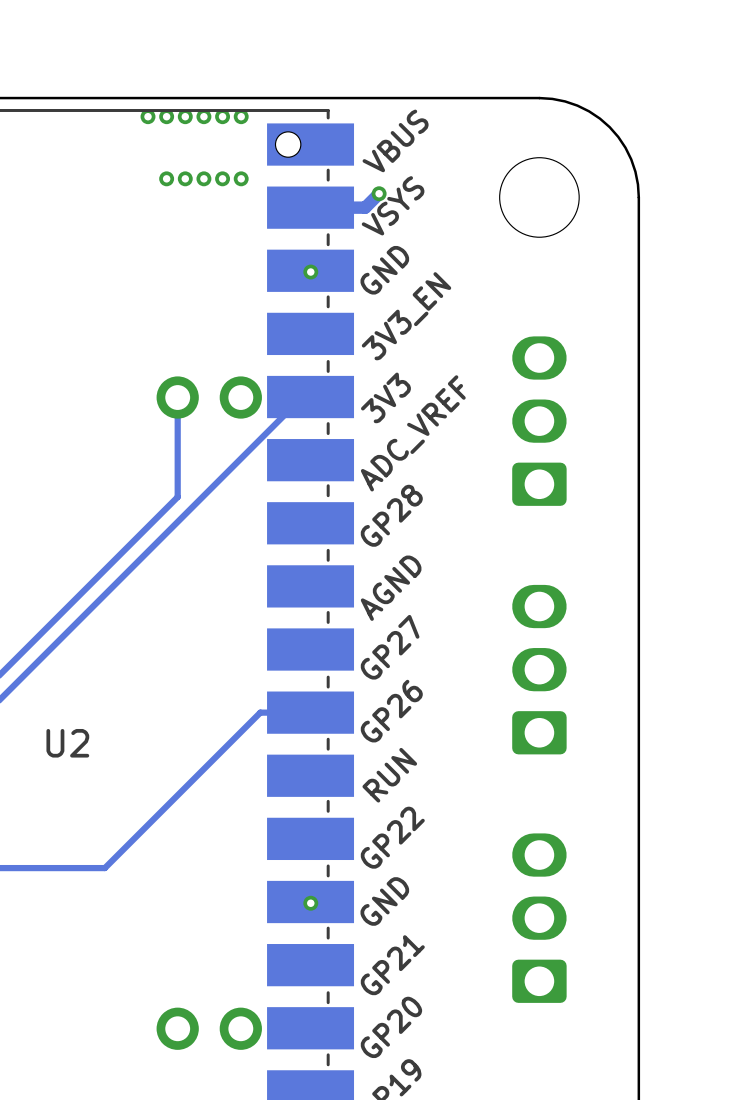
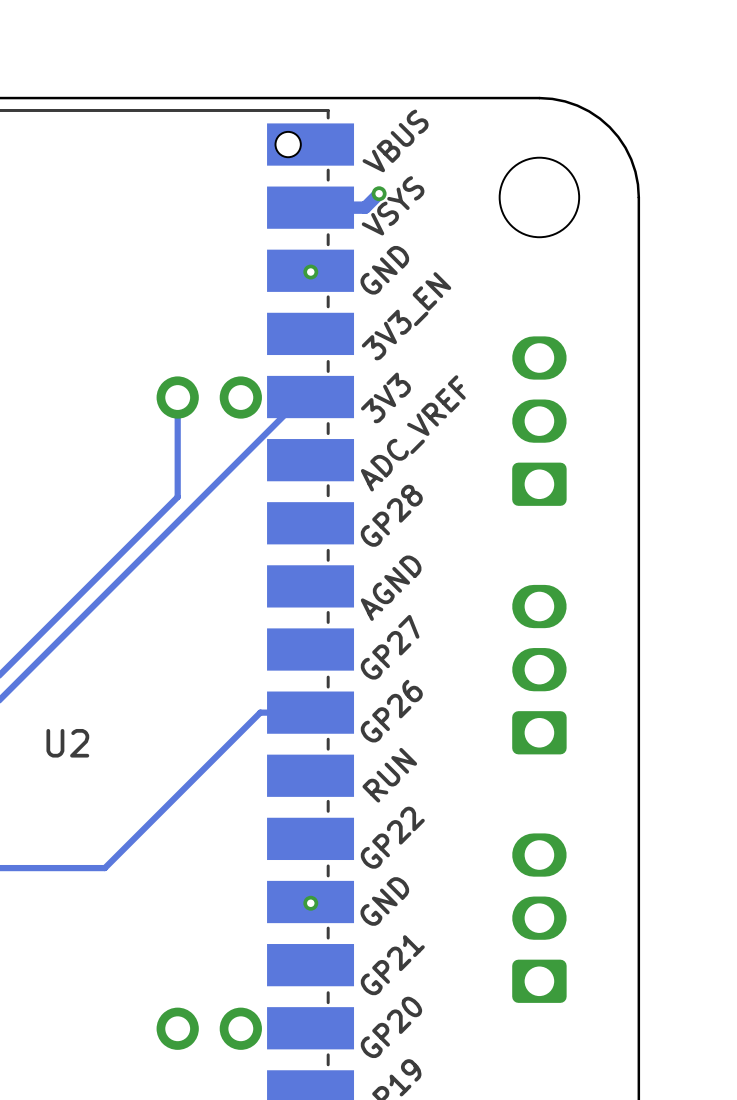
via: (148, 116) -> none
via: (166, 116) -> none
via: (185, 116) -> none
via: (203, 116) -> none
via: (222, 116) -> none
via: (241, 116) -> none
via: (166, 178) -> none
via: (185, 178) -> none
via: (203, 178) -> none
via: (222, 178) -> none
via: (241, 178) -> none

